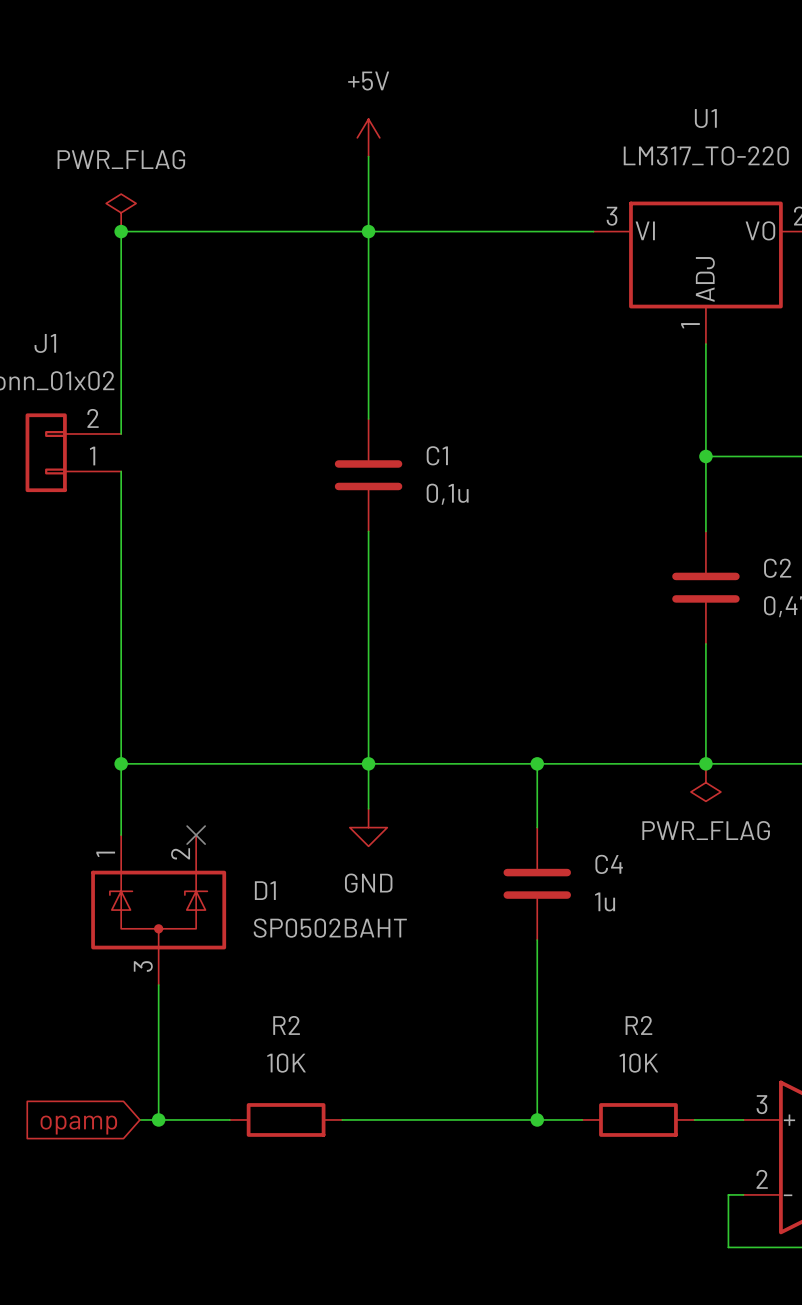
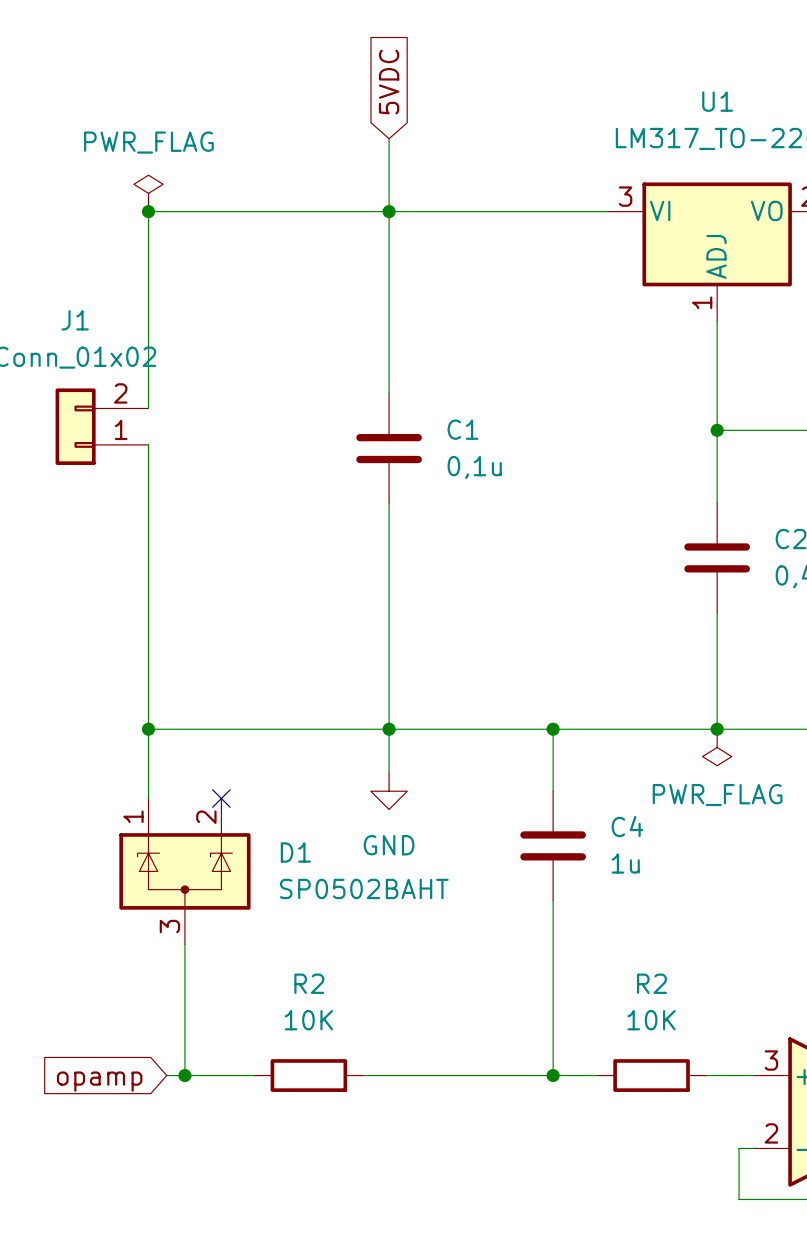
global label: none -> 5VDC (389, 82)
power symbol: +5V (368, 137) -> none

